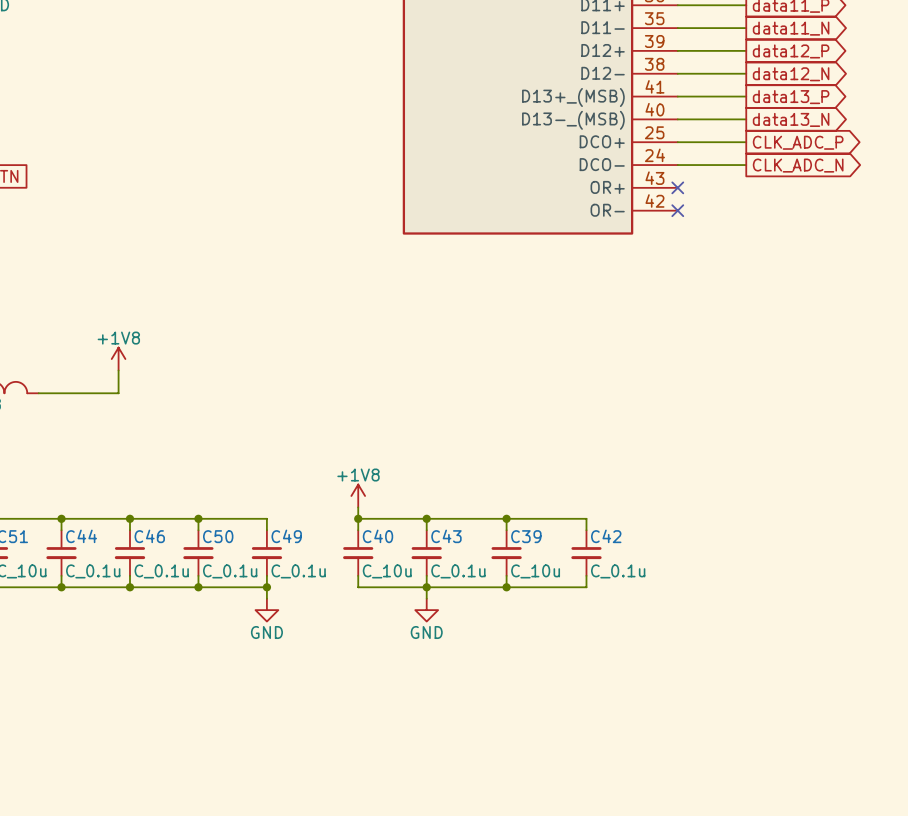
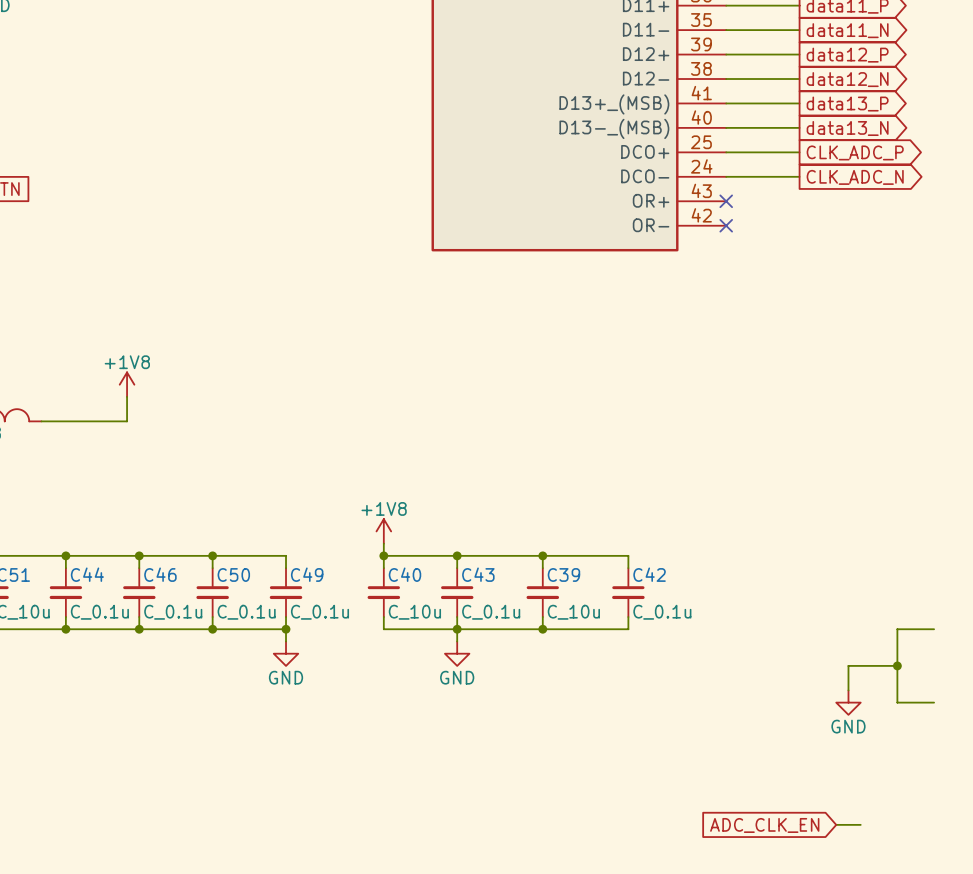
wire: none -> (934, 629) (897, 629) (897, 702) (934, 702)
wire: none -> (897, 665) (848, 665) (848, 690)
junction: none -> (897, 665)
power symbol: none -> GND (848, 702)
wire: none -> (836, 824) (860, 824)
global label: none -> ADC_CLK_EN (764, 825)

